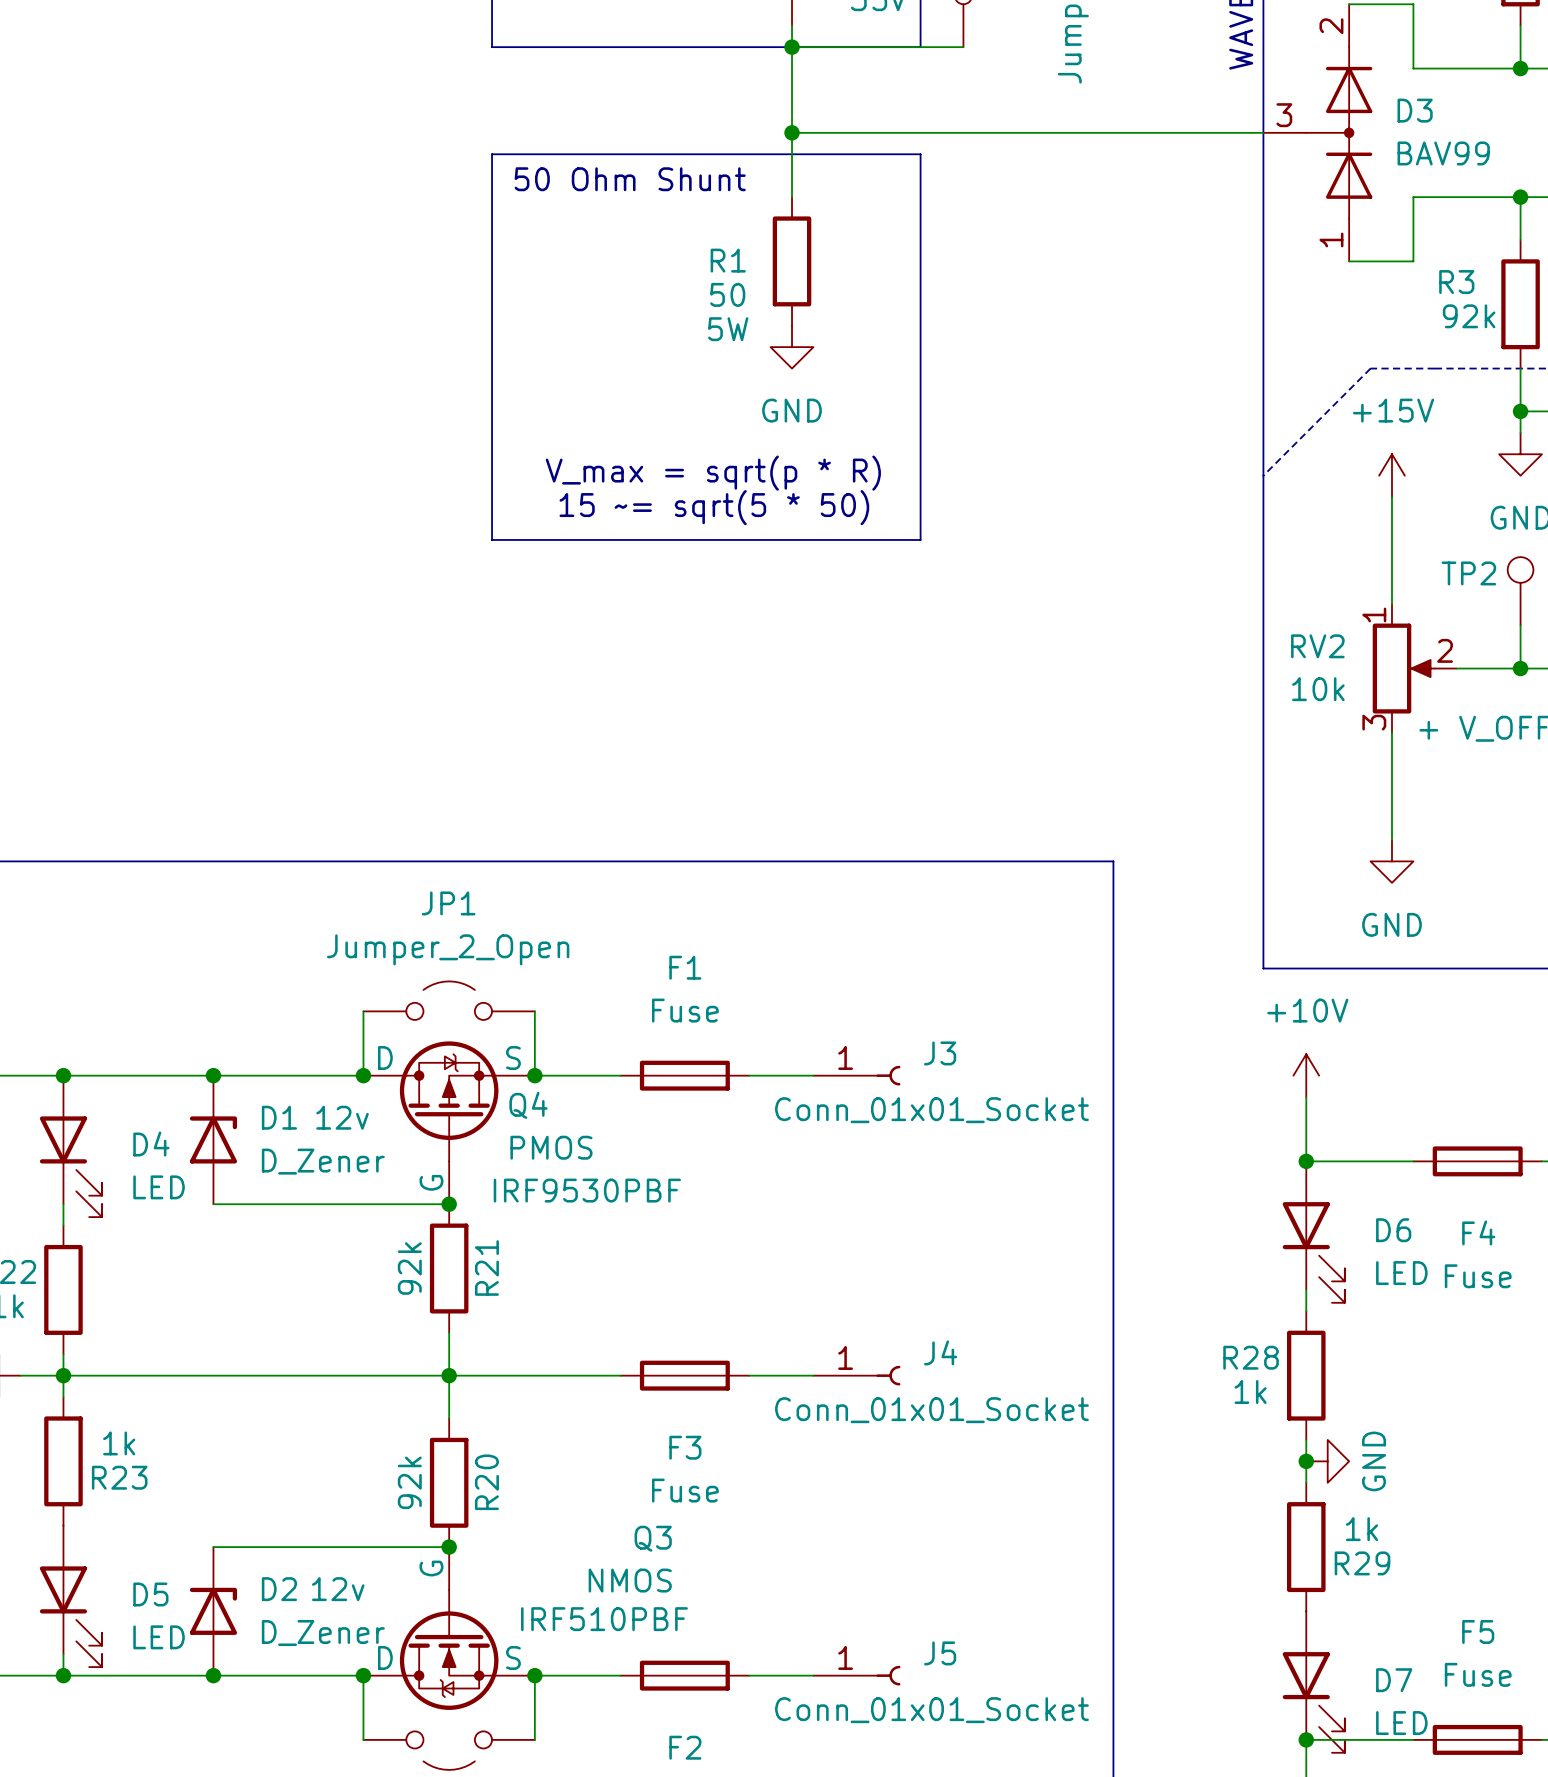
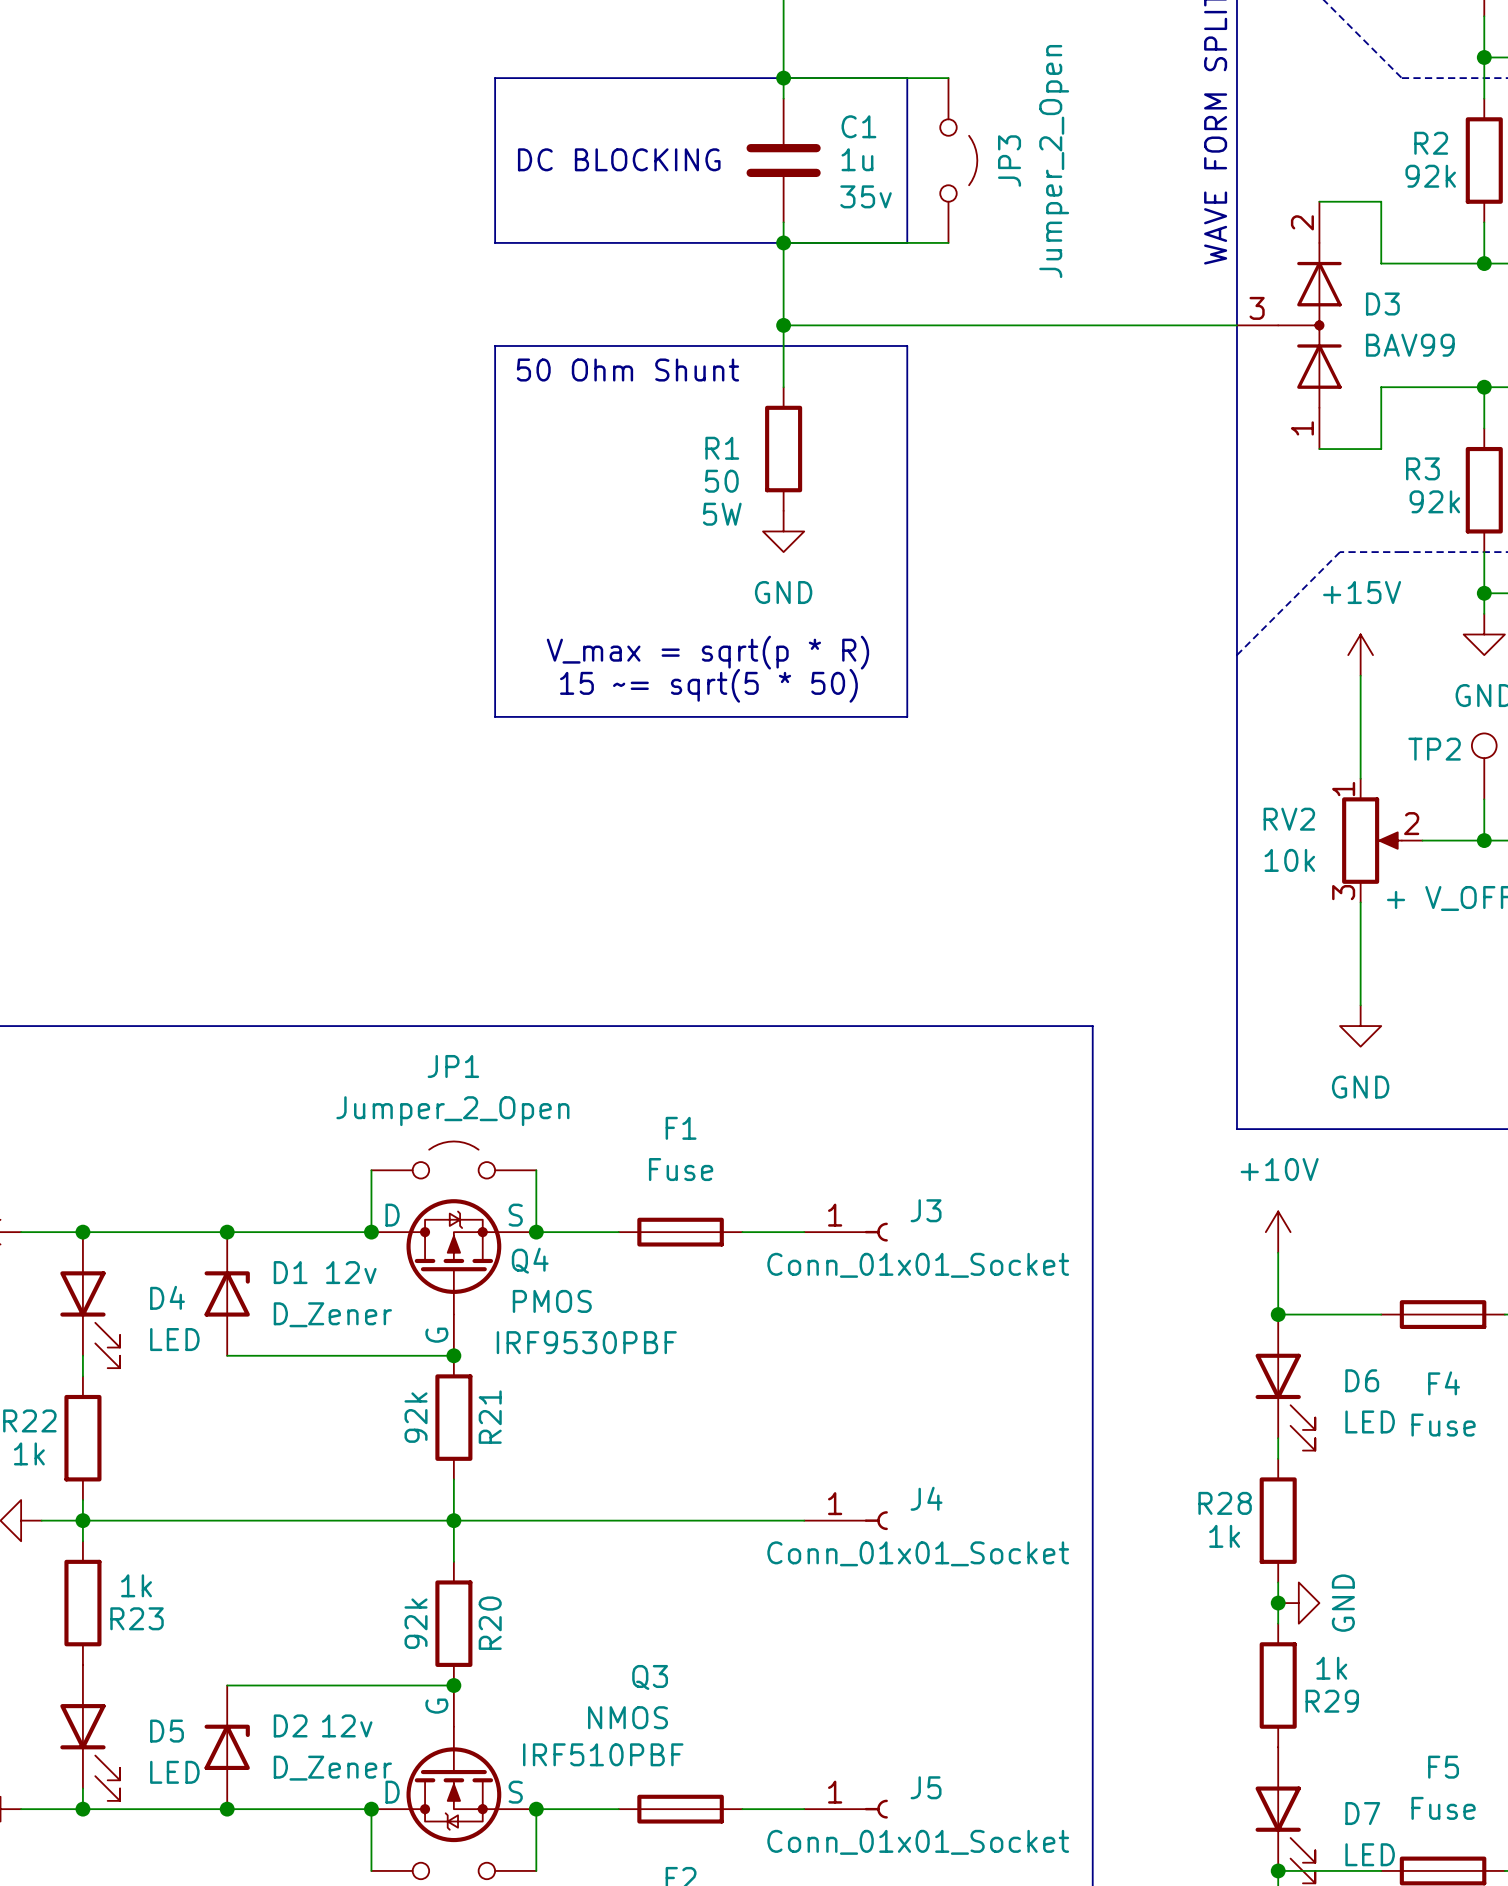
F3: Fuse (684, 1375) -> none

